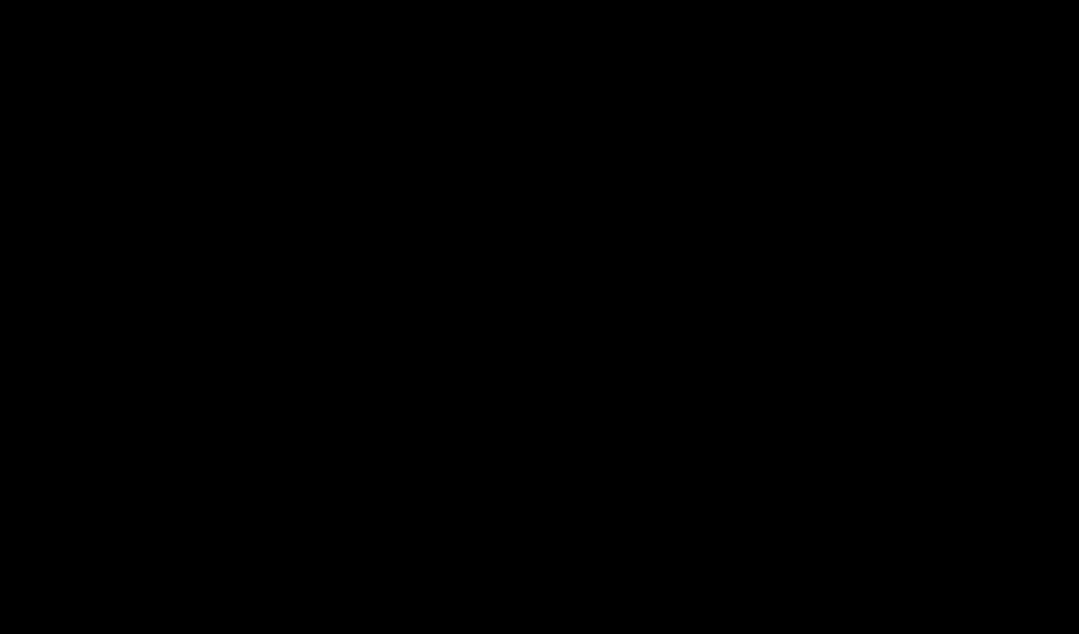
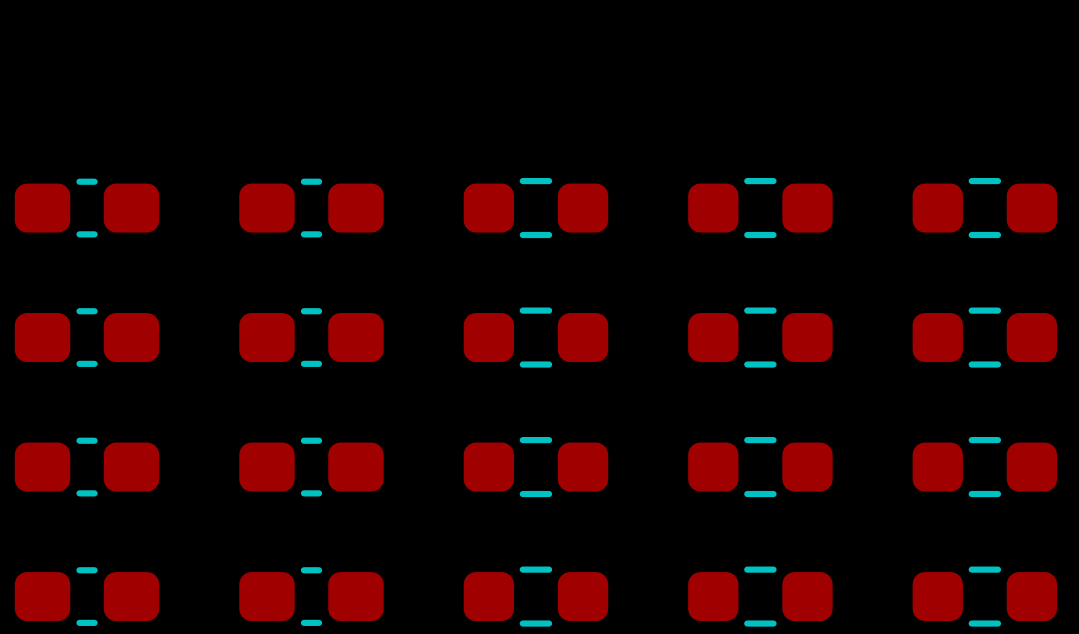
part: none -> (87, 208)
part: none -> (311, 208)
part: none -> (535, 208)
part: none -> (760, 208)
part: none -> (984, 208)
part: none -> (87, 337)
part: none -> (311, 337)
part: none -> (535, 337)
part: none -> (760, 337)
part: none -> (984, 337)
part: none -> (87, 467)
part: none -> (311, 467)
part: none -> (535, 467)
part: none -> (760, 467)
part: none -> (984, 467)
part: none -> (87, 596)
part: none -> (311, 596)
part: none -> (535, 596)
part: none -> (760, 596)
part: none -> (984, 596)

